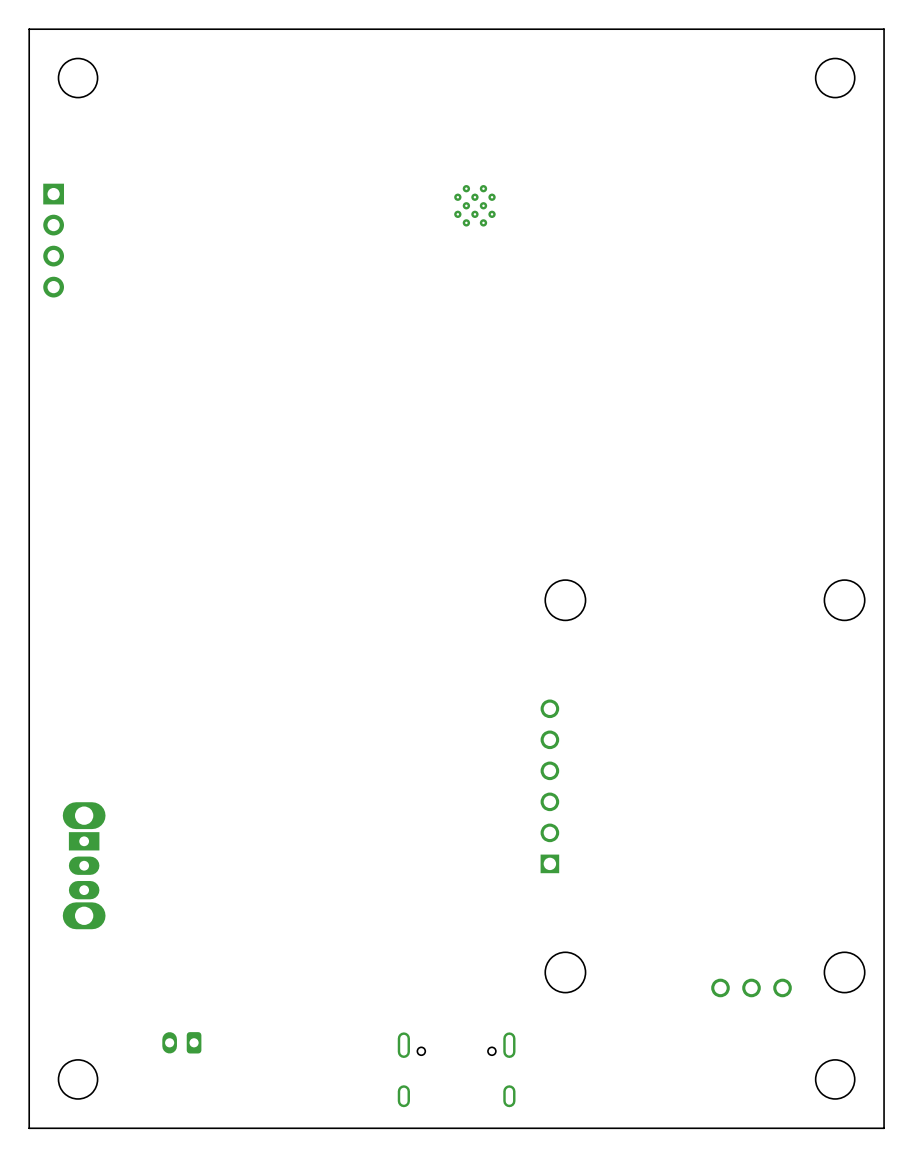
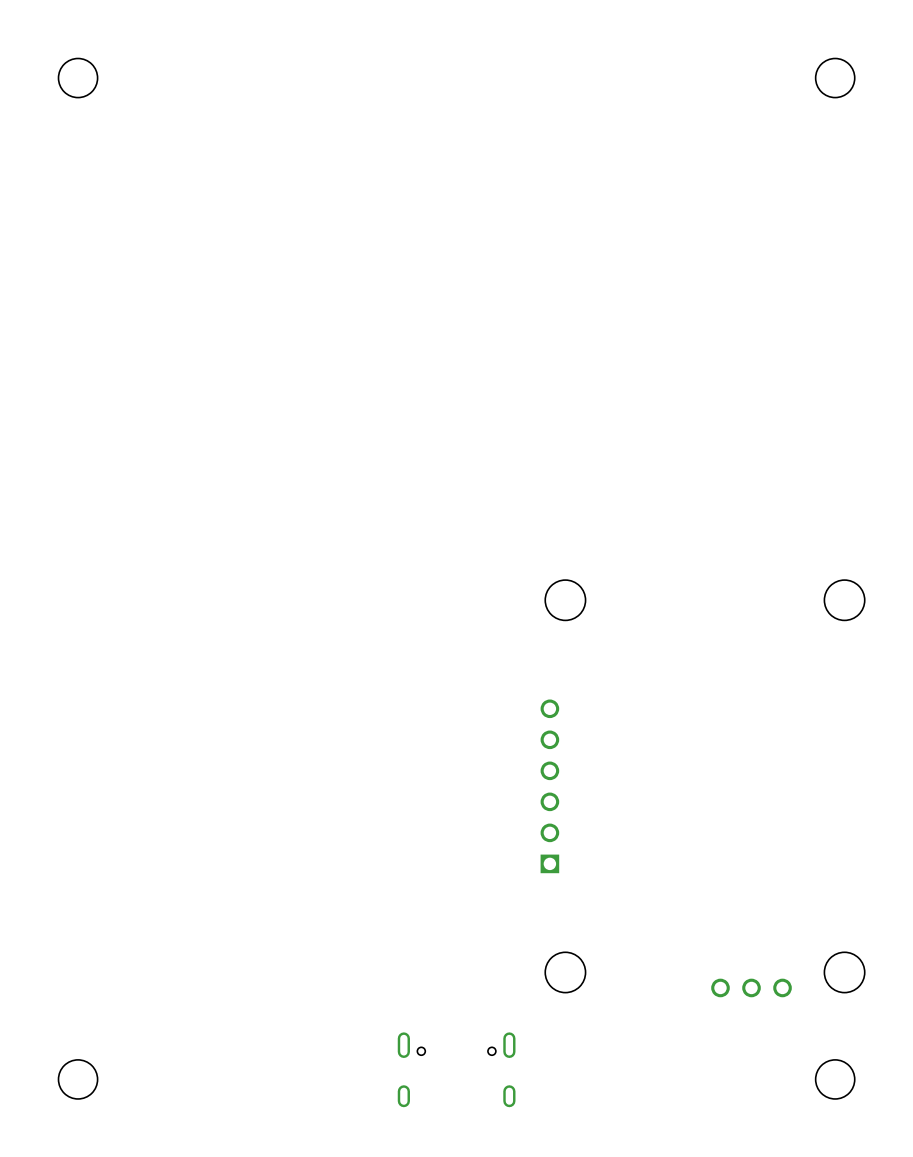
board edge: (884, 29) (29, 29) (29, 1128) (884, 1128) (884, 29) -> none
part: (474, 205) -> none
part: (53, 240) -> none
part: (84, 865) -> none
part: (181, 1042) -> none

